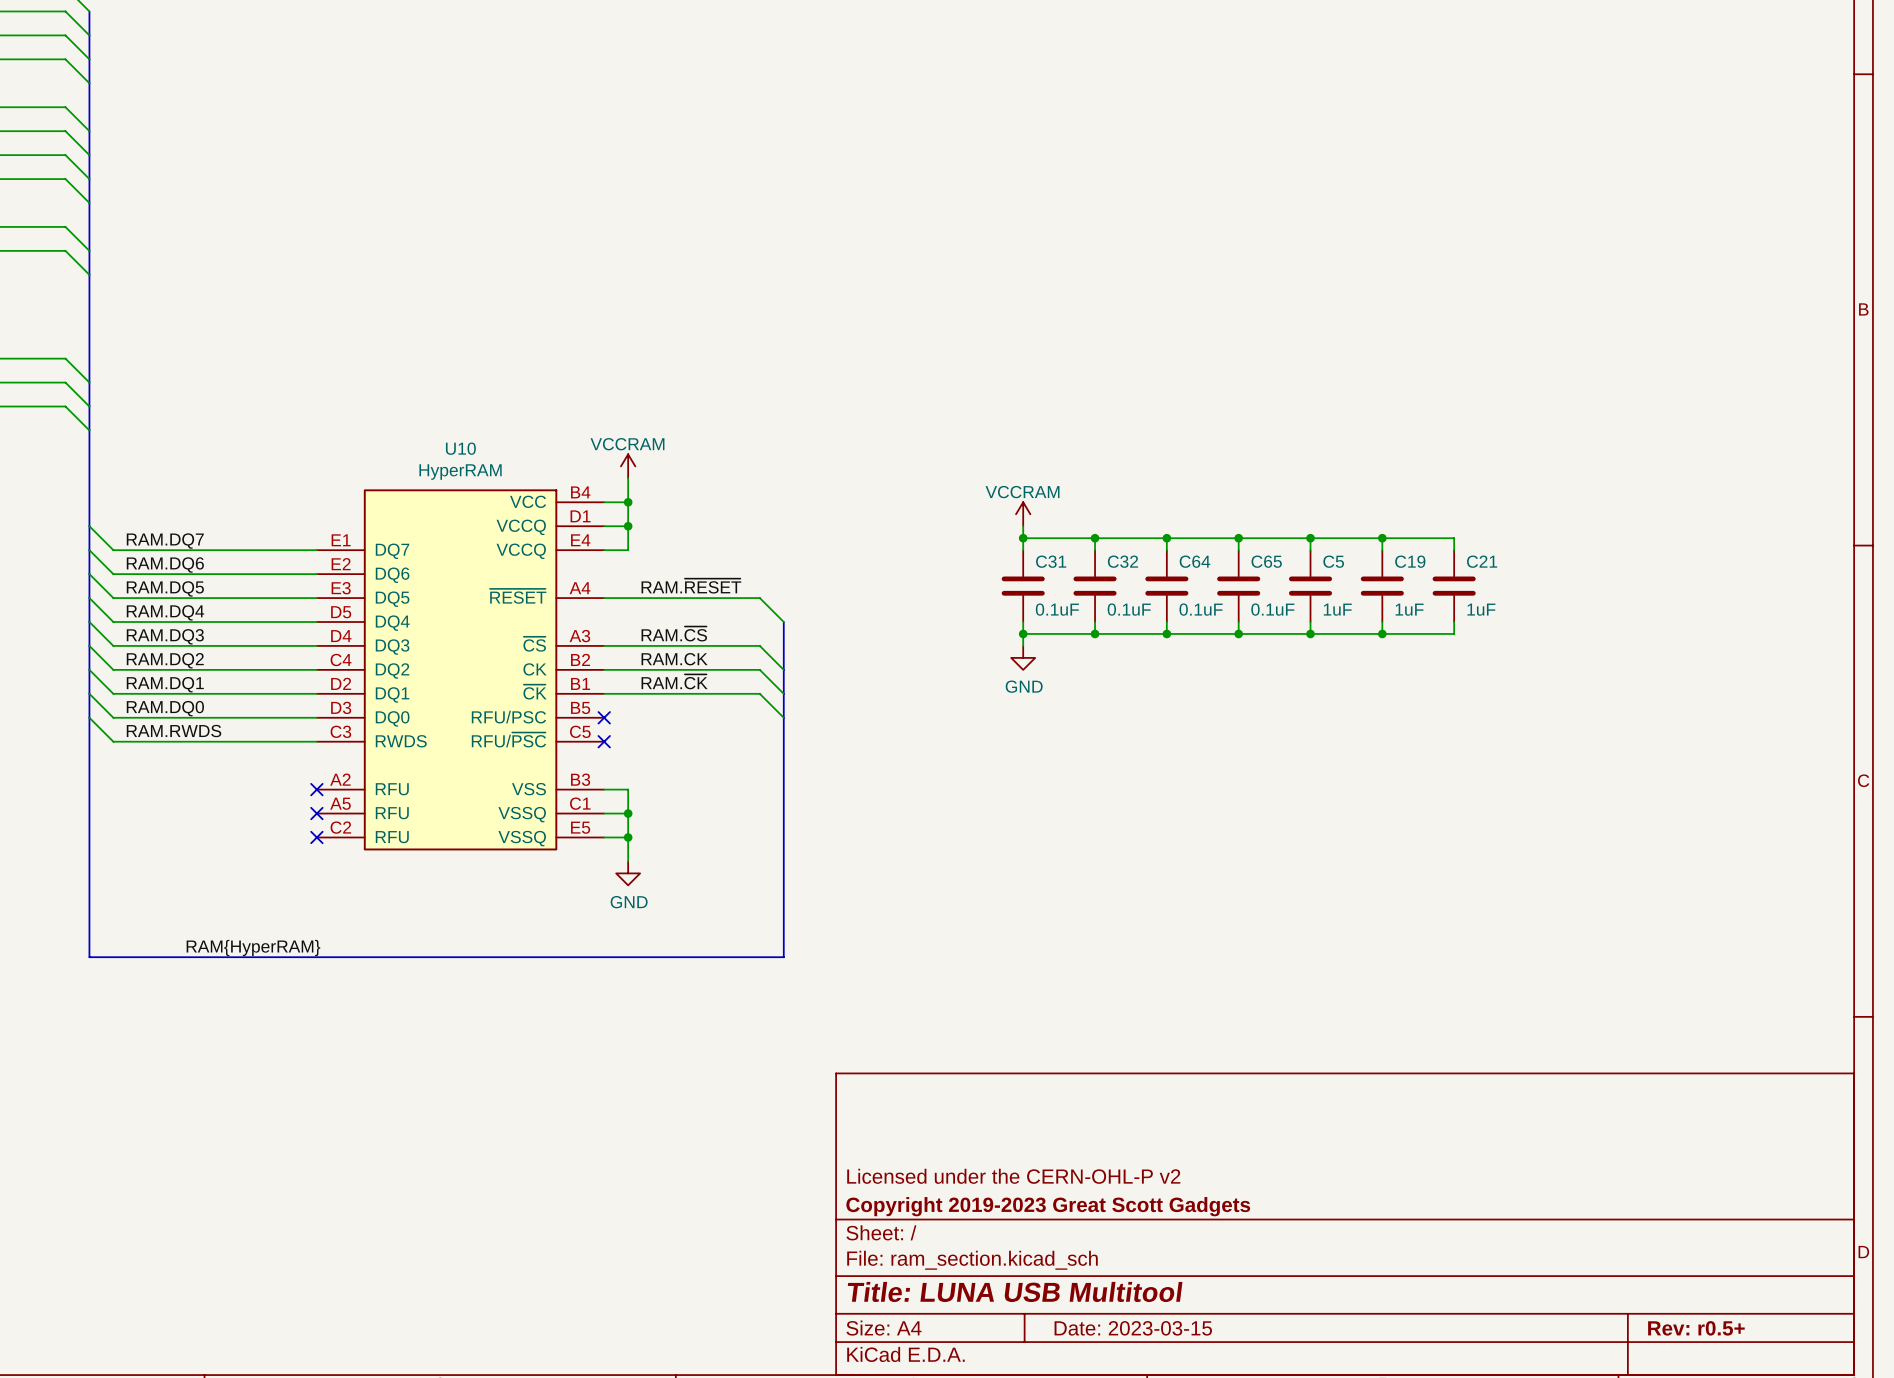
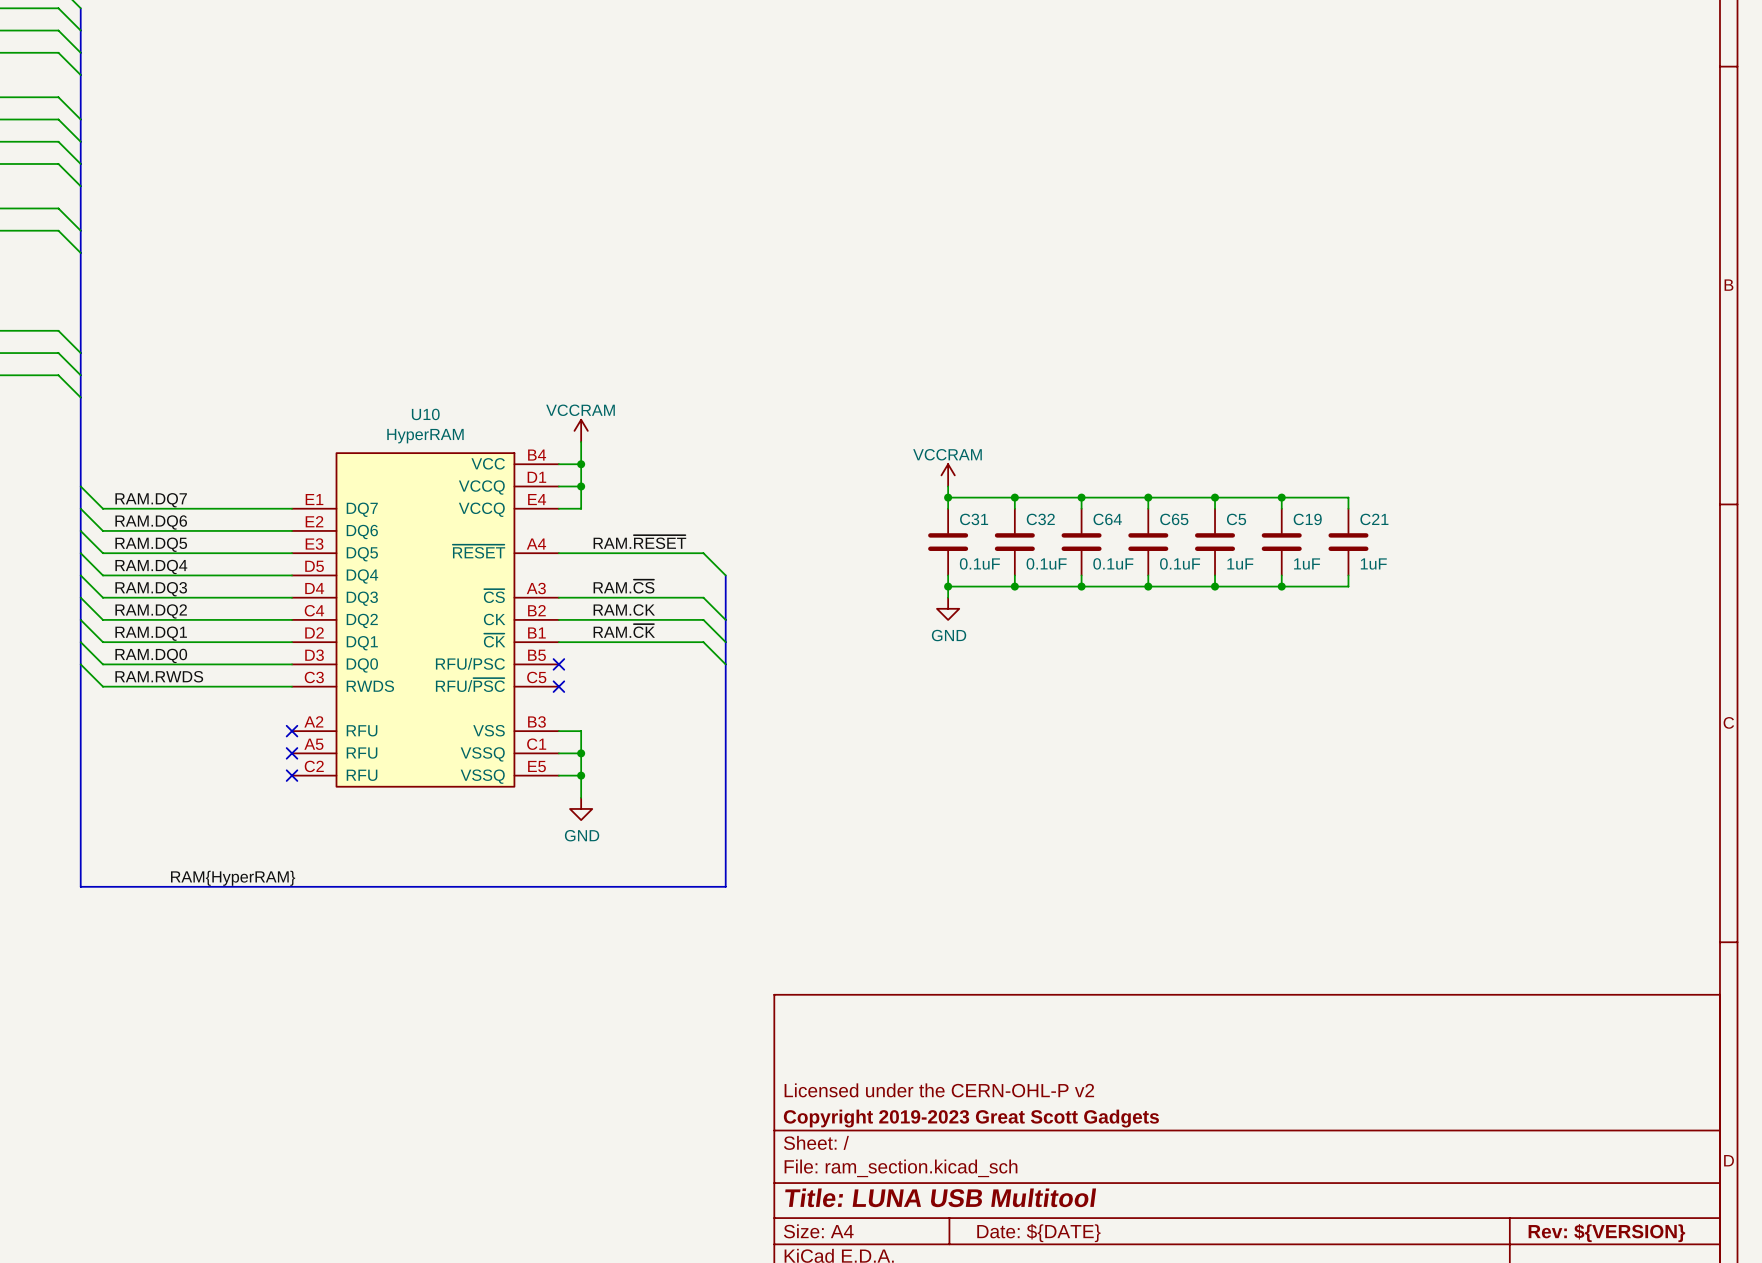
title block: Date: 2023-03-15 (1133, 1328) -> Date: ${DATE} (1038, 1233)
title block: Rev: r0.5+ (1696, 1328) -> Rev: ${VERSION} (1606, 1233)

